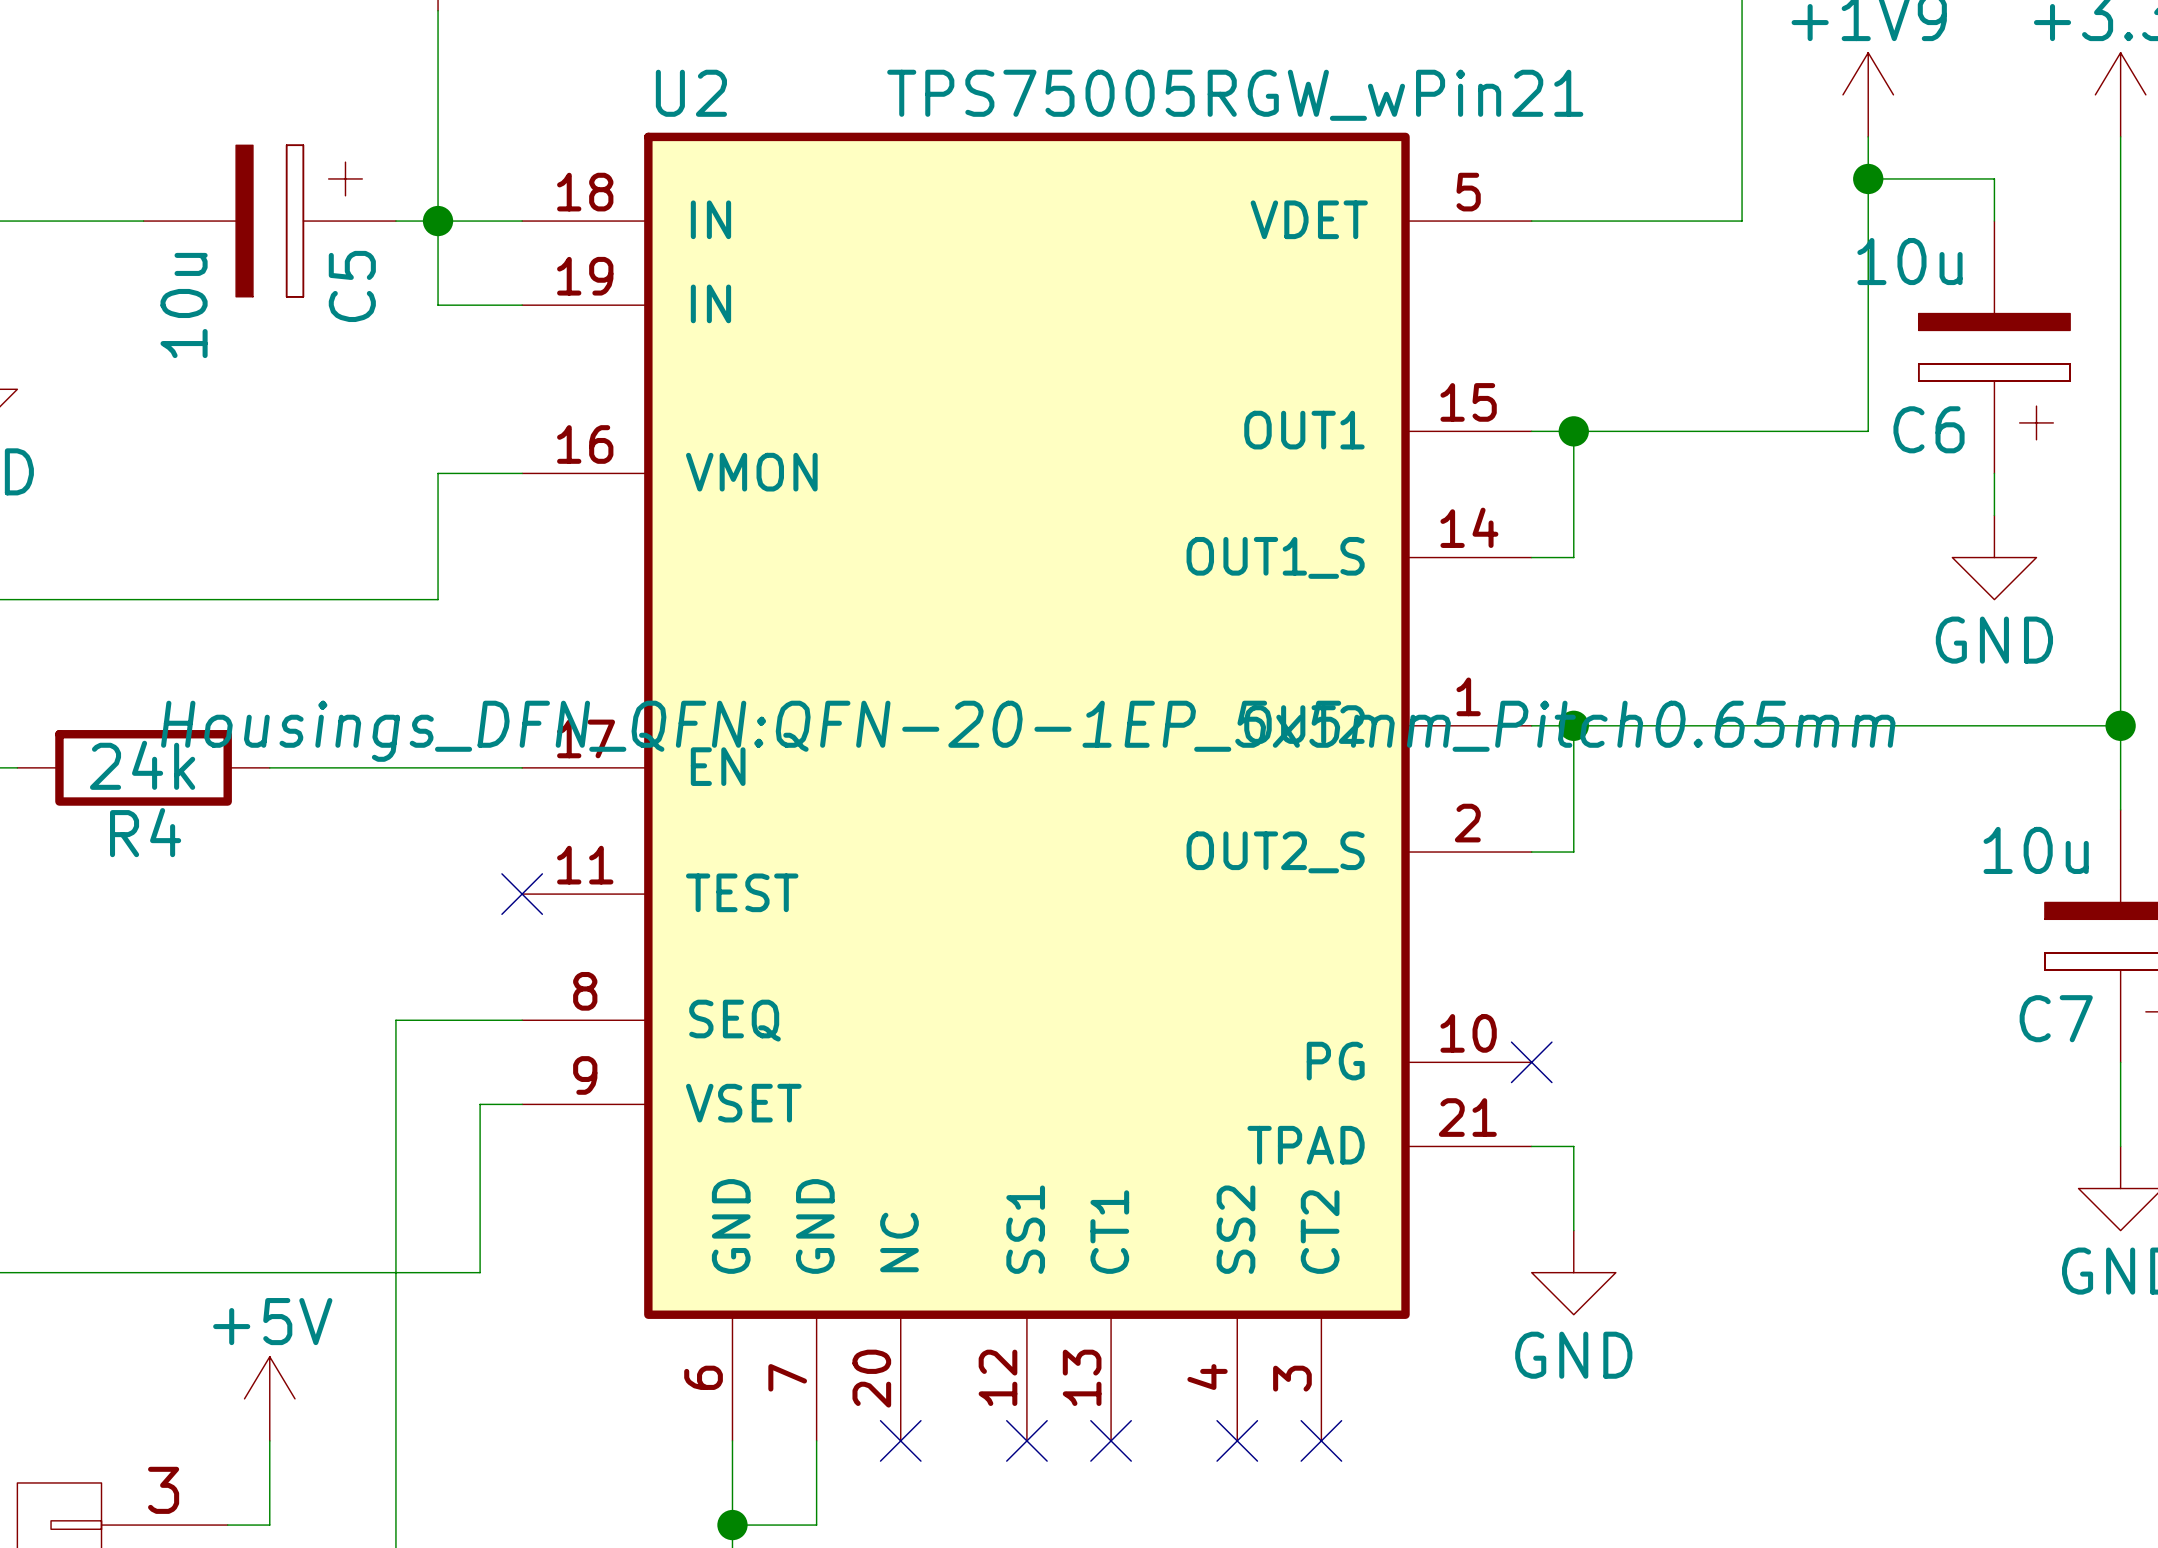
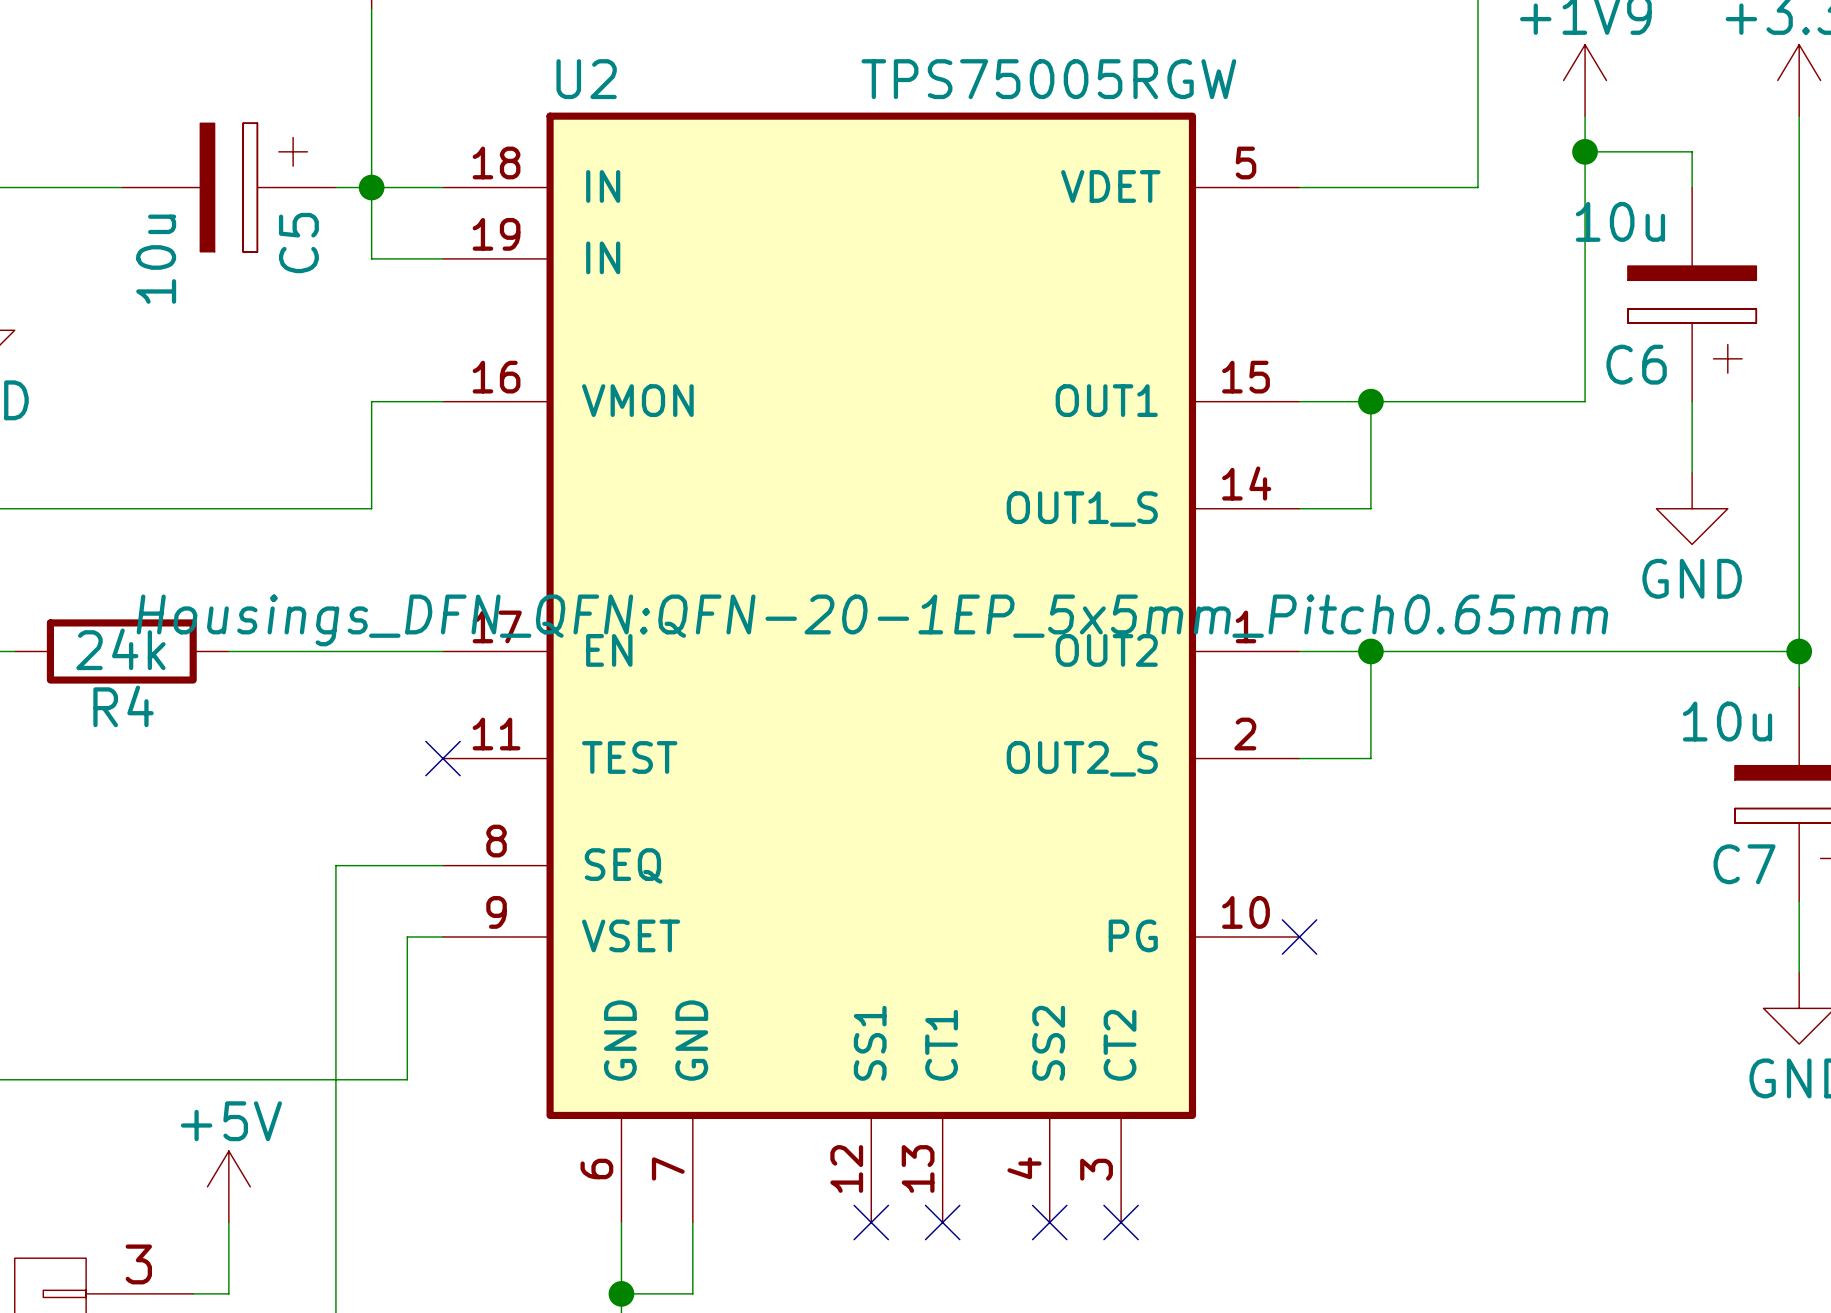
U2 value: TPS75005RGW_wPin21 (1235, 95) -> TPS75005RGW (1048, 79)
U2 symbol: [522, 132, 1532, 1441] -> [443, 112, 1300, 1223]
wire: (1531, 431) (1868, 431) -> (1299, 401) (1585, 401) (1585, 365)
wire: (1573, 431) (1573, 557) (1531, 557) -> none
junction position: (1573, 431) -> (1370, 401)
wire: none -> (1370, 401) (1370, 508) (1299, 508)
power symbol position: GND (1994, 557) -> GND (1692, 508)
wire: (1531, 725) (2120, 725) -> (1299, 651) (1799, 651)
wire: (1573, 725) (1573, 852) (1531, 852) -> none
junction position: (1573, 725) -> (1370, 651)
junction position: (2120, 725) -> (1799, 651)
wire: none -> (1370, 651) (1370, 758) (1299, 758)
no-connect mark position: (1531, 1062) -> (1299, 937)
wire: (1531, 1146) (1573, 1146) (1573, 1230) -> none
power symbol: GND (1573, 1272) -> none
no-connect mark: (900, 1440) -> none

